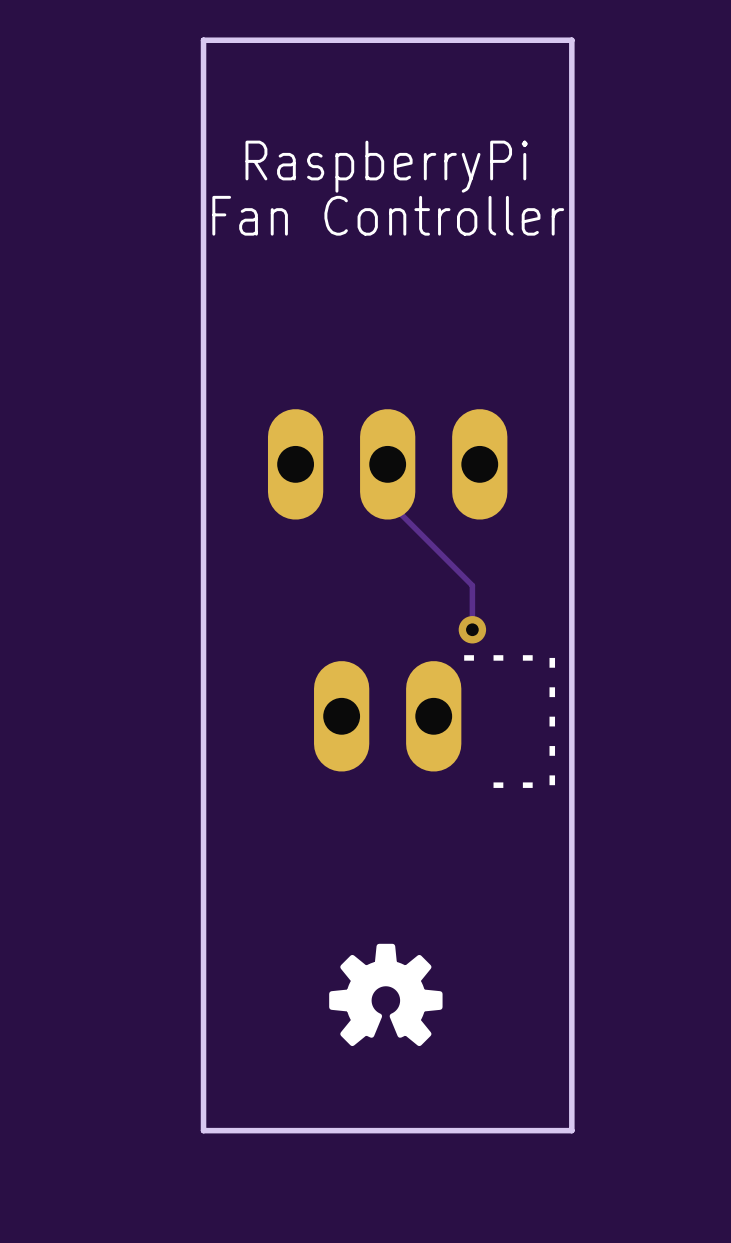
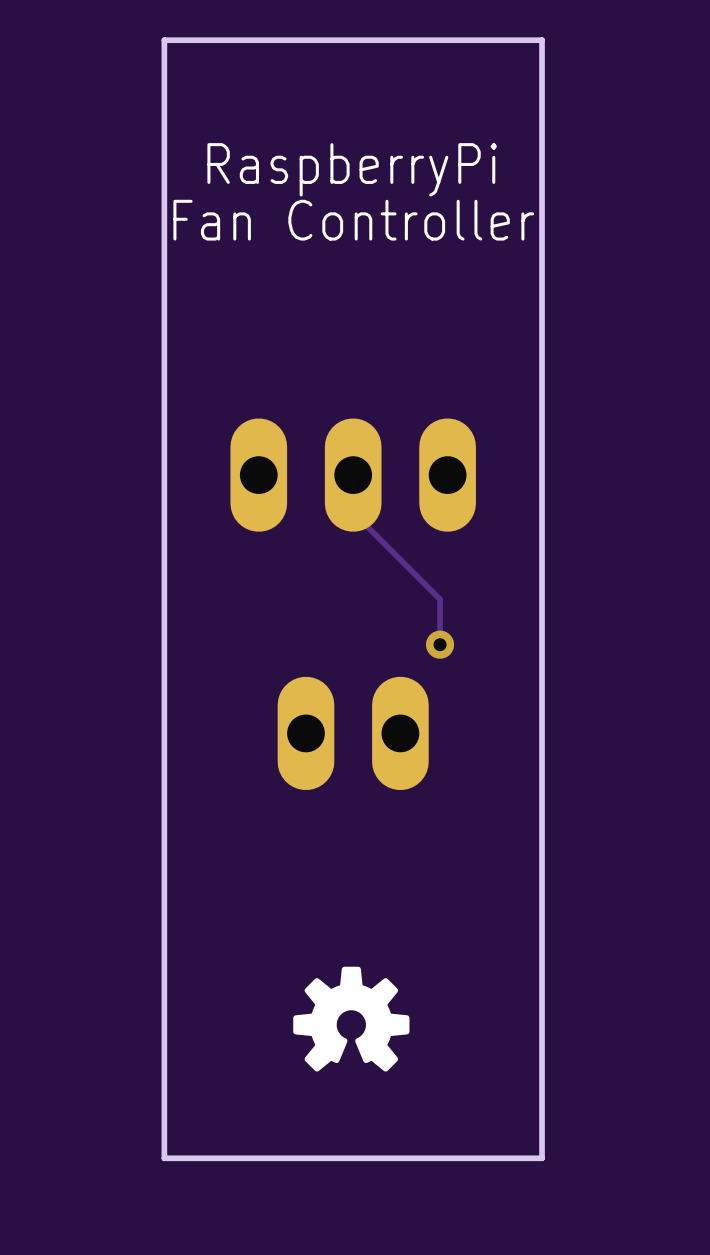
line: (473, 657) (464, 657) -> none
line: (503, 657) (493, 657) -> none
line: (532, 657) (522, 657) -> none
line: (552, 657) (552, 667) -> none
line: (552, 687) (552, 697) -> none
line: (552, 716) (552, 726) -> none
line: (552, 746) (552, 755) -> none
line: (552, 775) (552, 785) -> none
line: (503, 785) (493, 785) -> none
line: (532, 785) (522, 785) -> none

